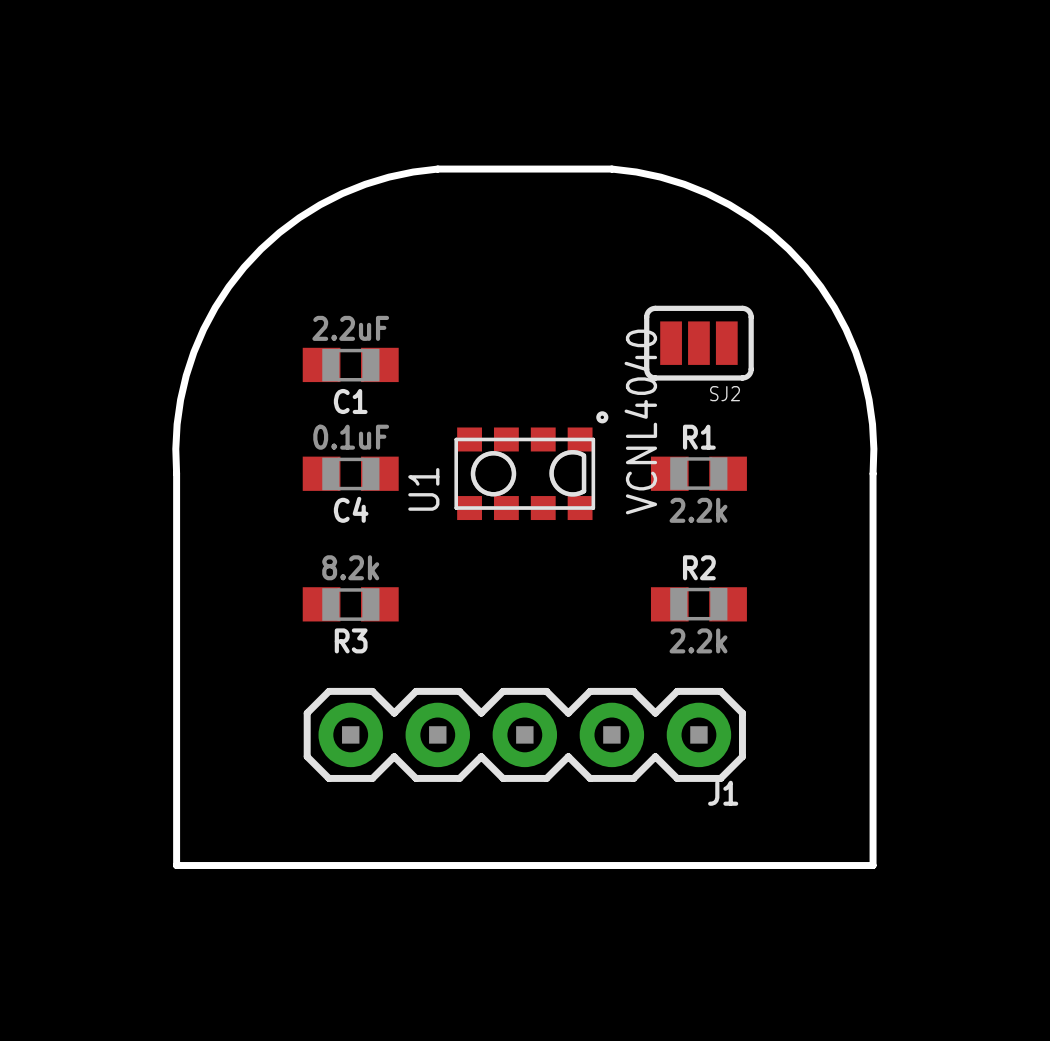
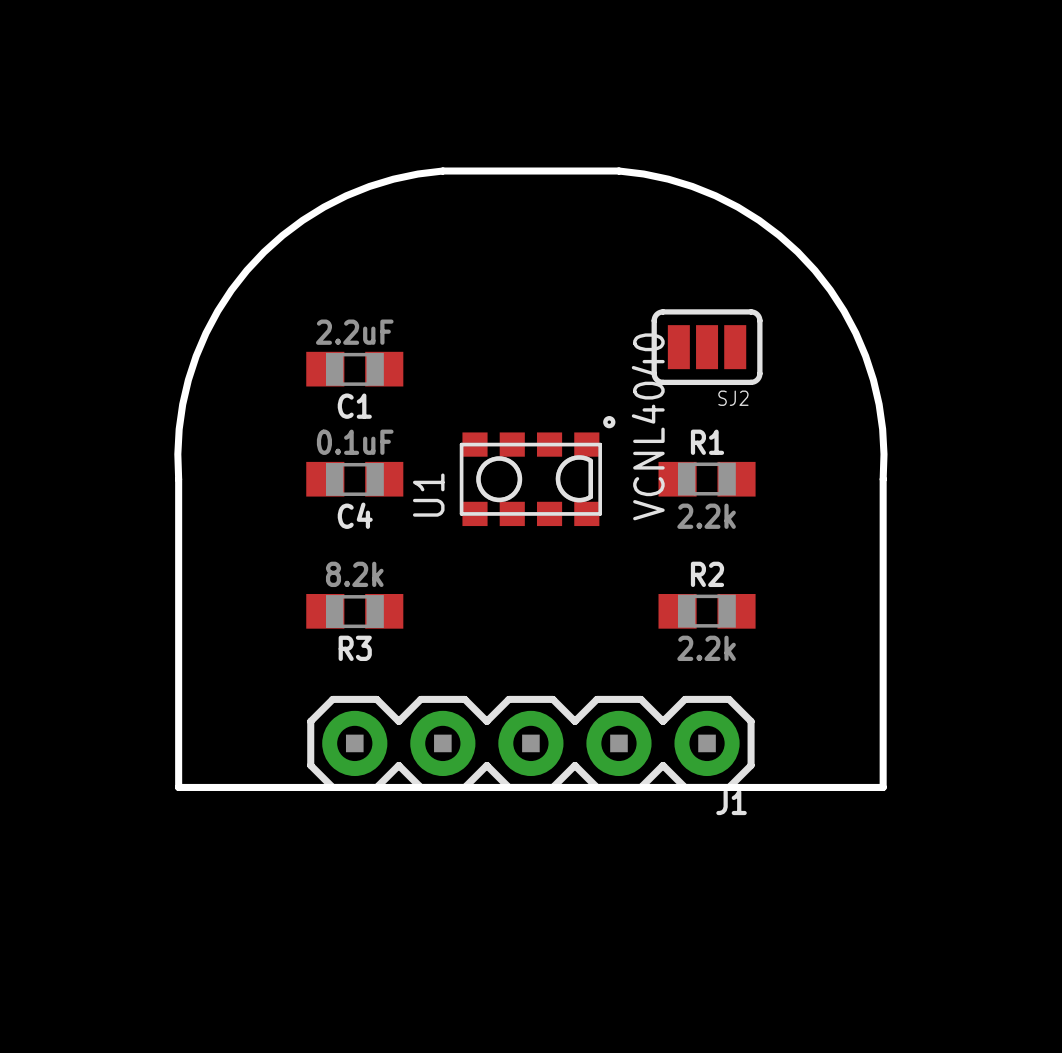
board edge: (176, 778) (176, 865) (873, 865) (873, 778) -> (178, 787) (883, 787)

